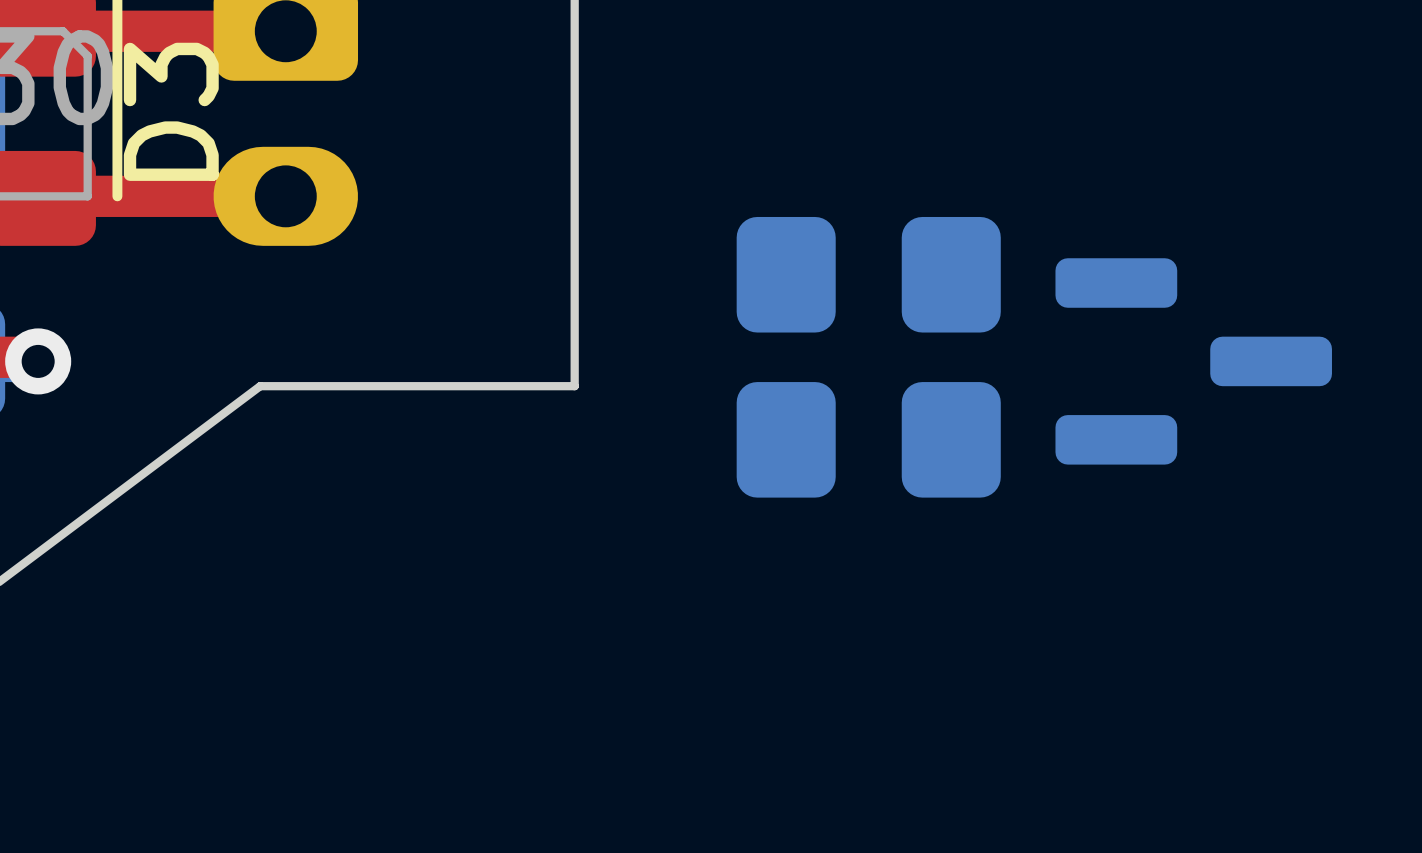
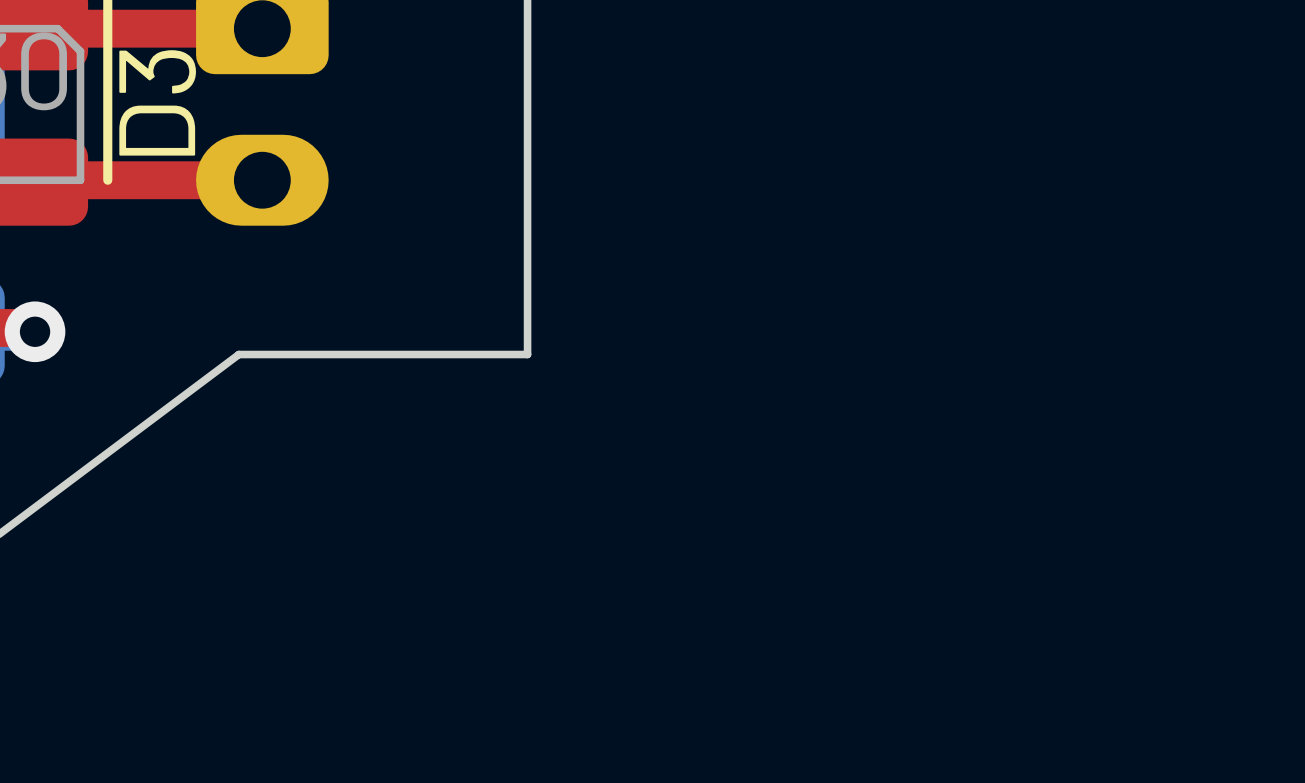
part: (868, 274) -> none
part: (1193, 361) -> none
part: (868, 439) -> none

